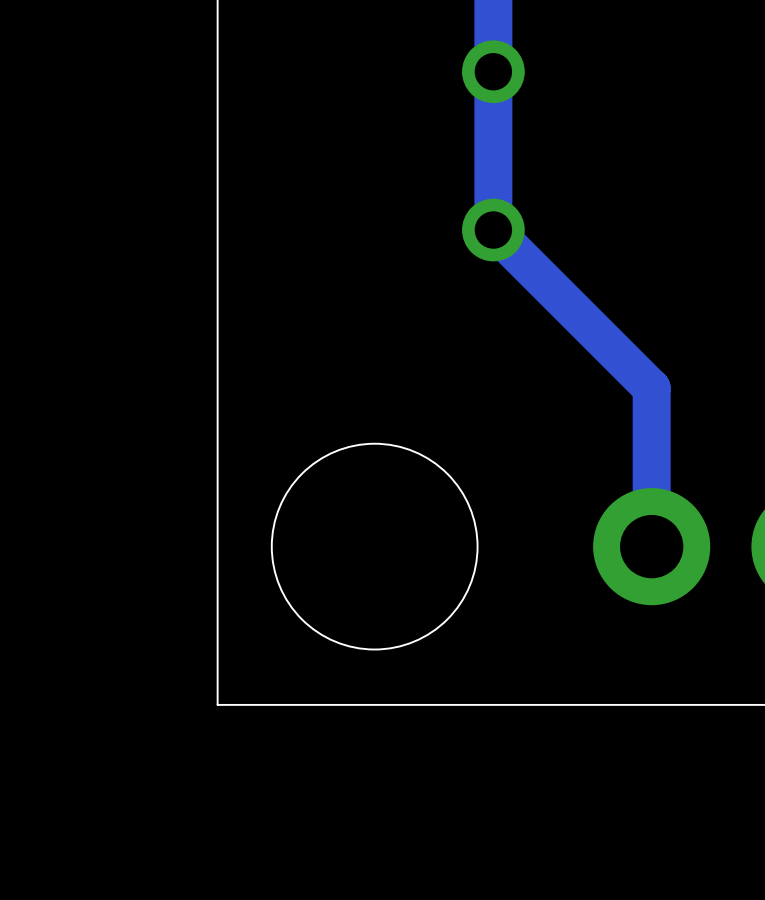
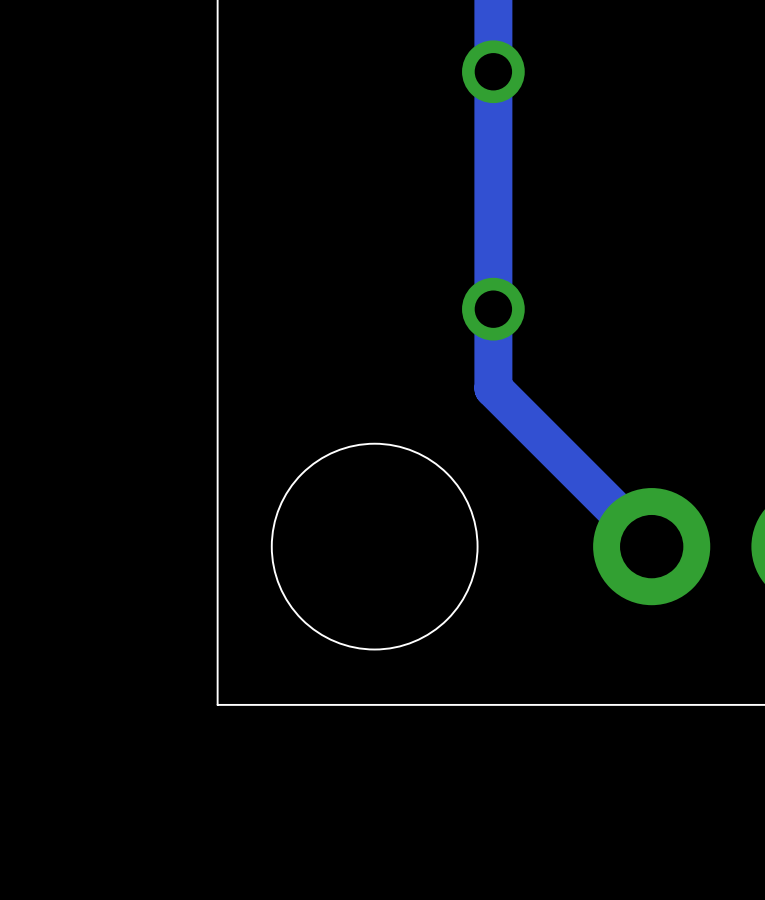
track: (493, 230) (651, 388) (651, 546) -> (493, 230) (493, 388) (651, 546)
via position: (493, 230) -> (493, 309)

